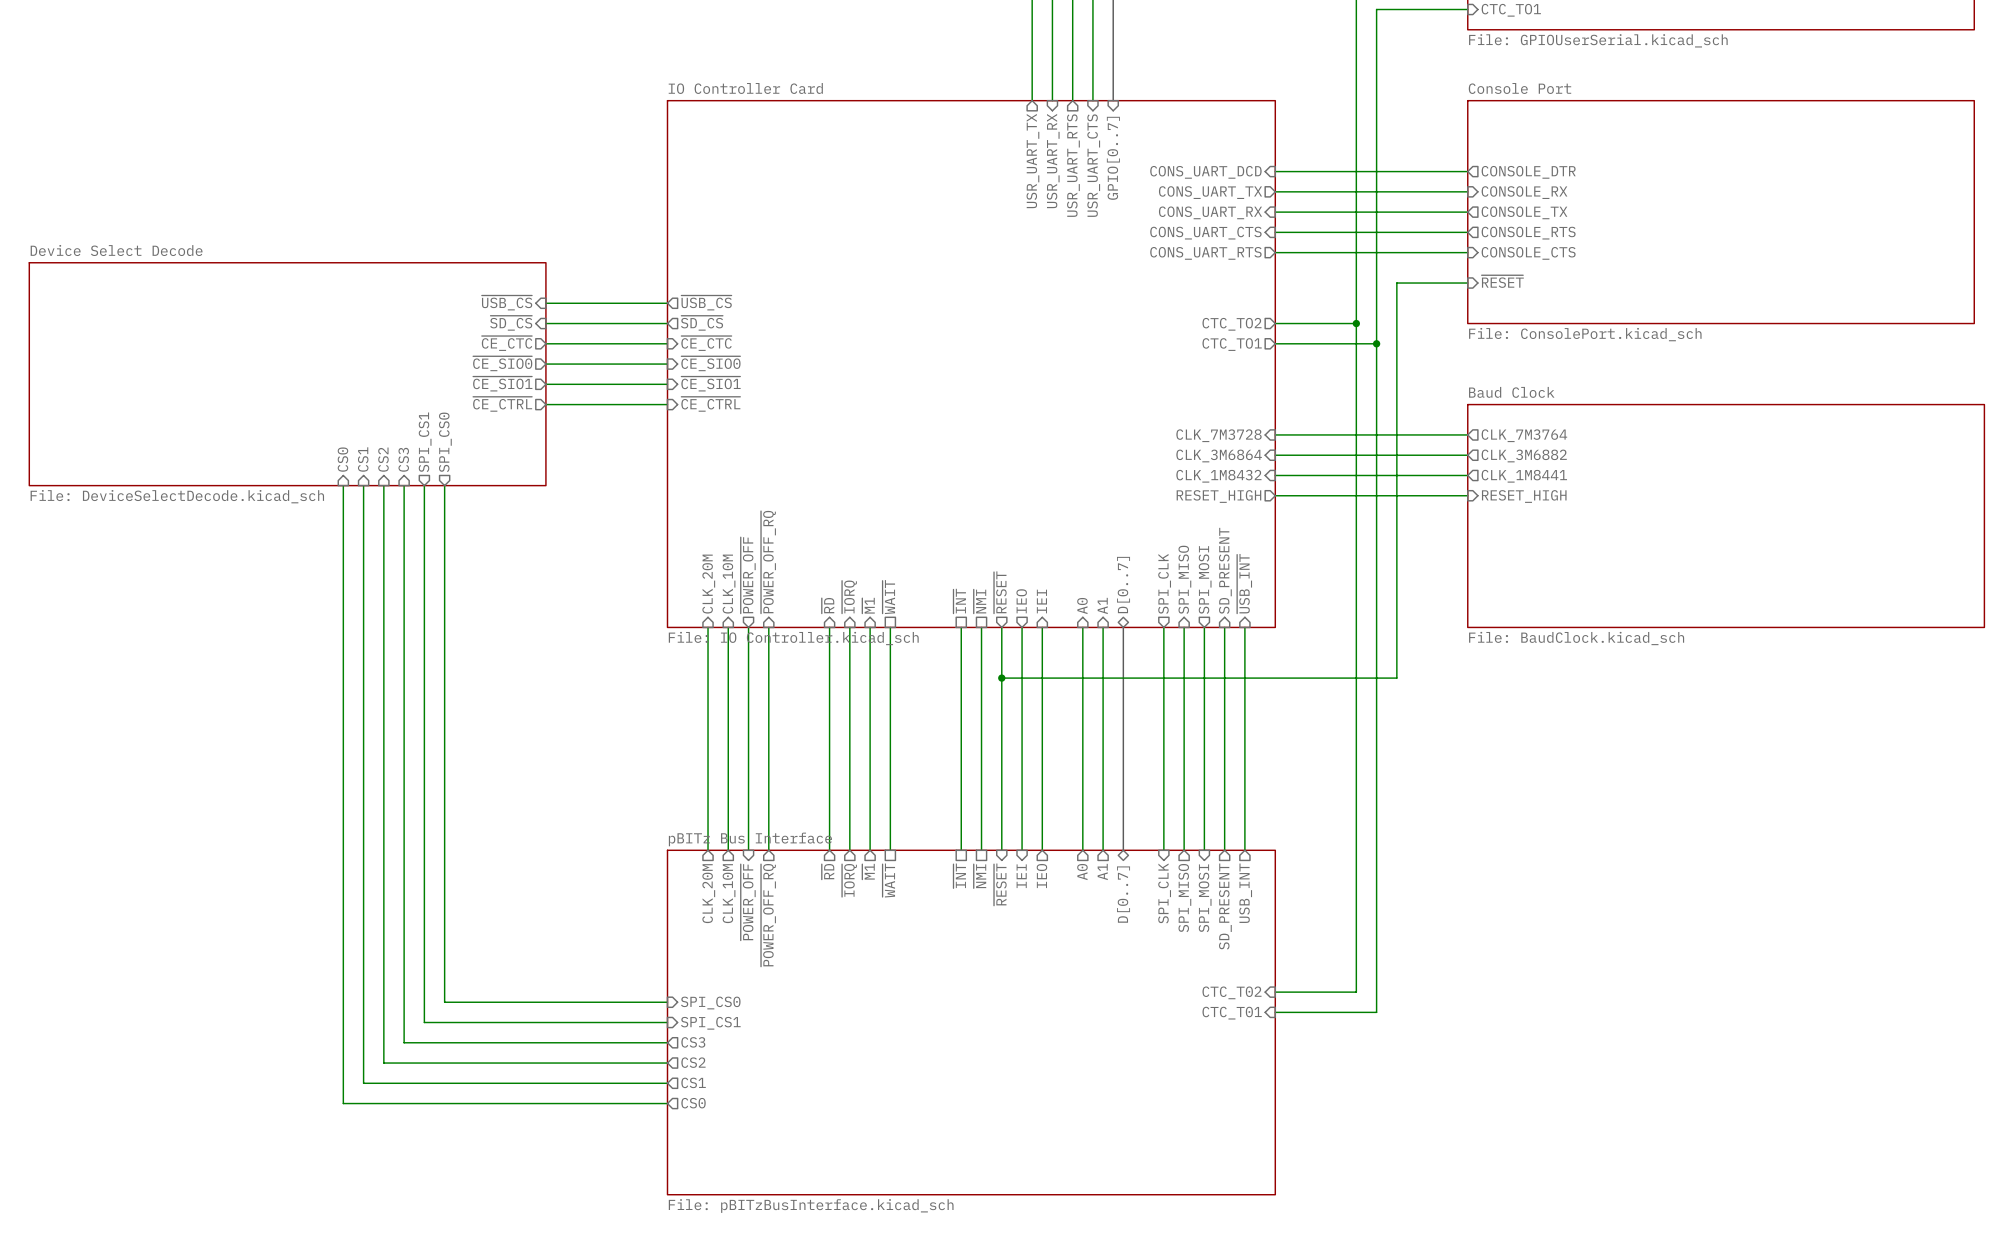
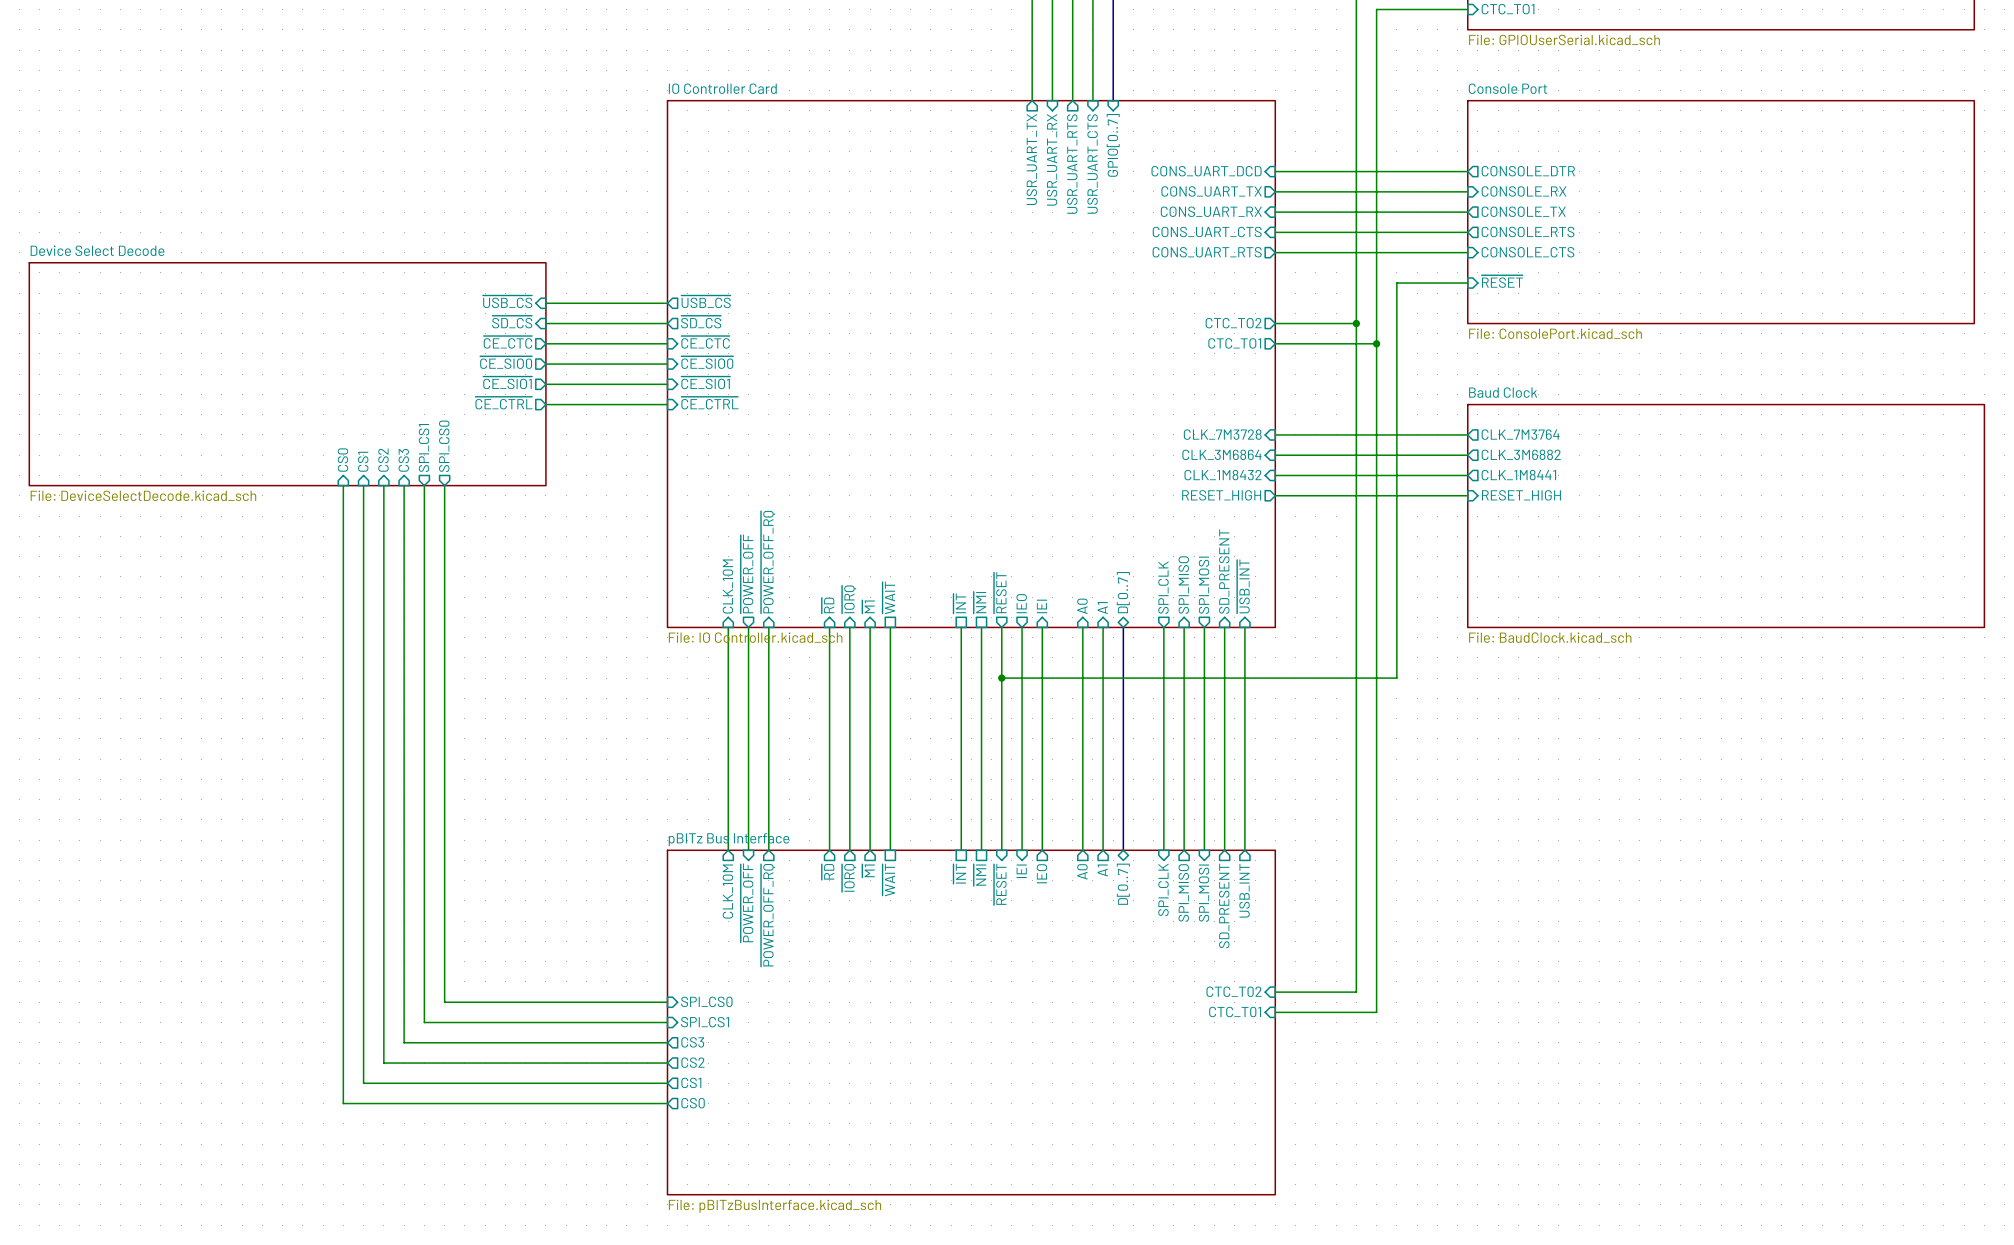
sheet pin: CLK_20M (708, 584) -> none
wire: (708, 627) (708, 850) -> none
sheet pin: CLK_20M (708, 893) -> none

